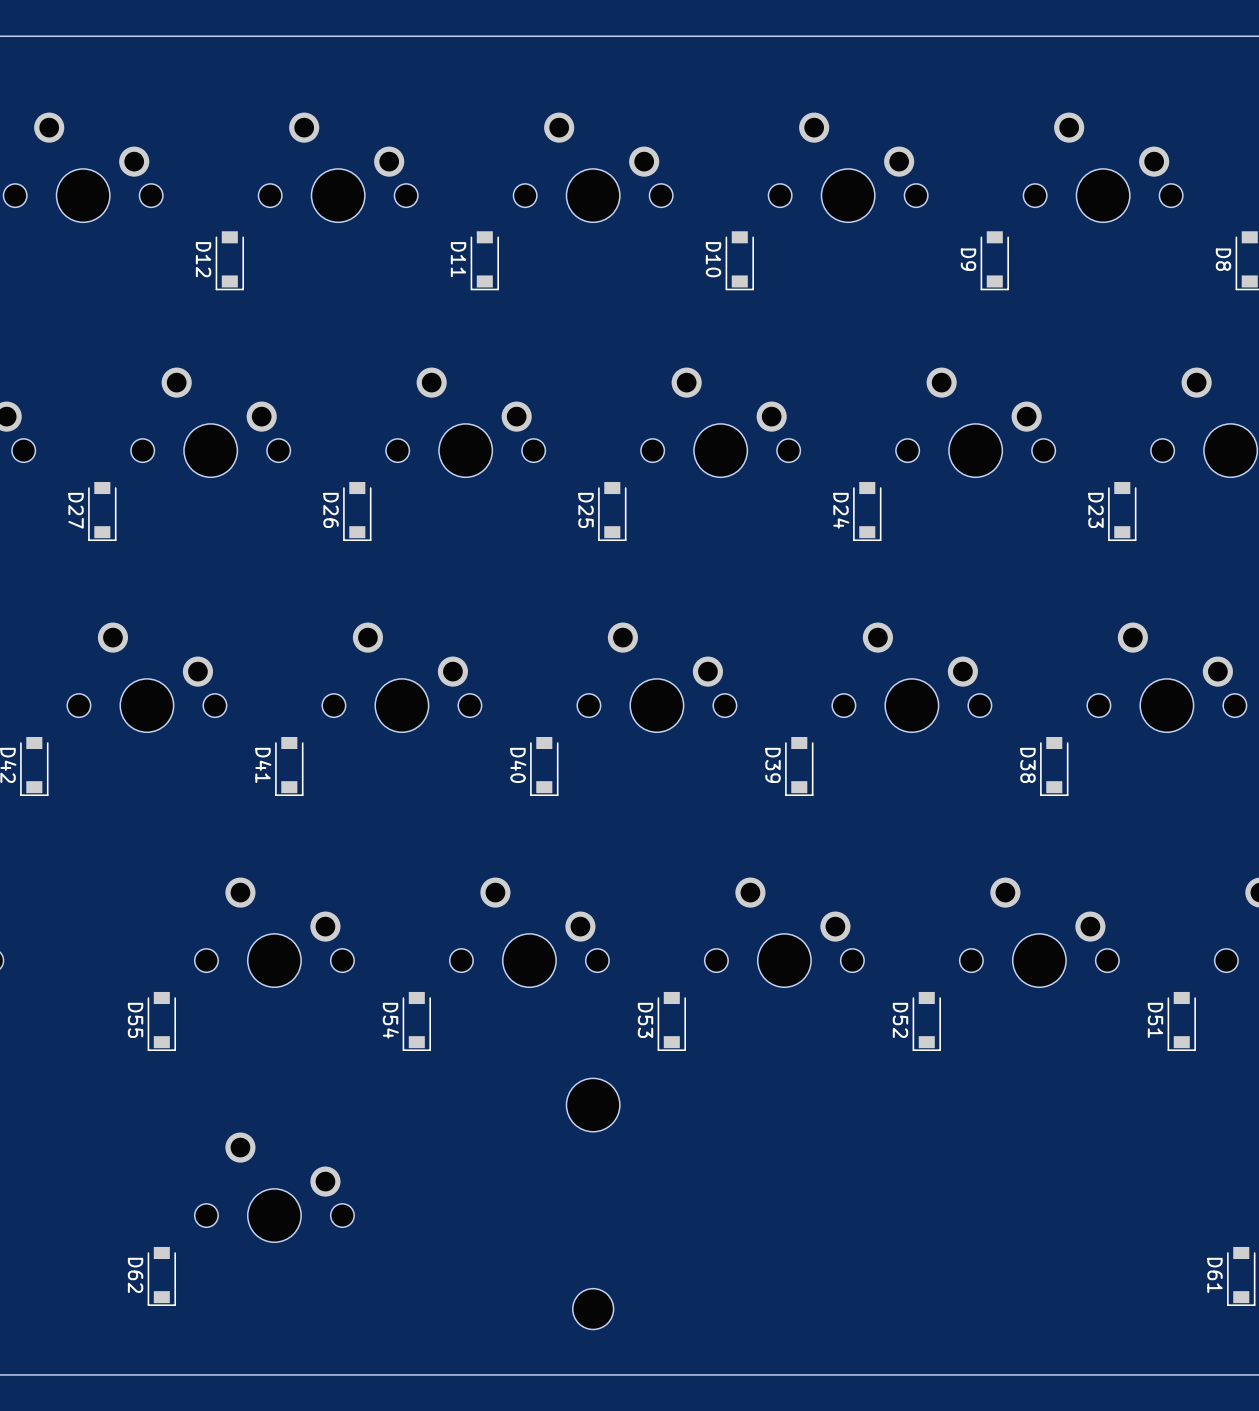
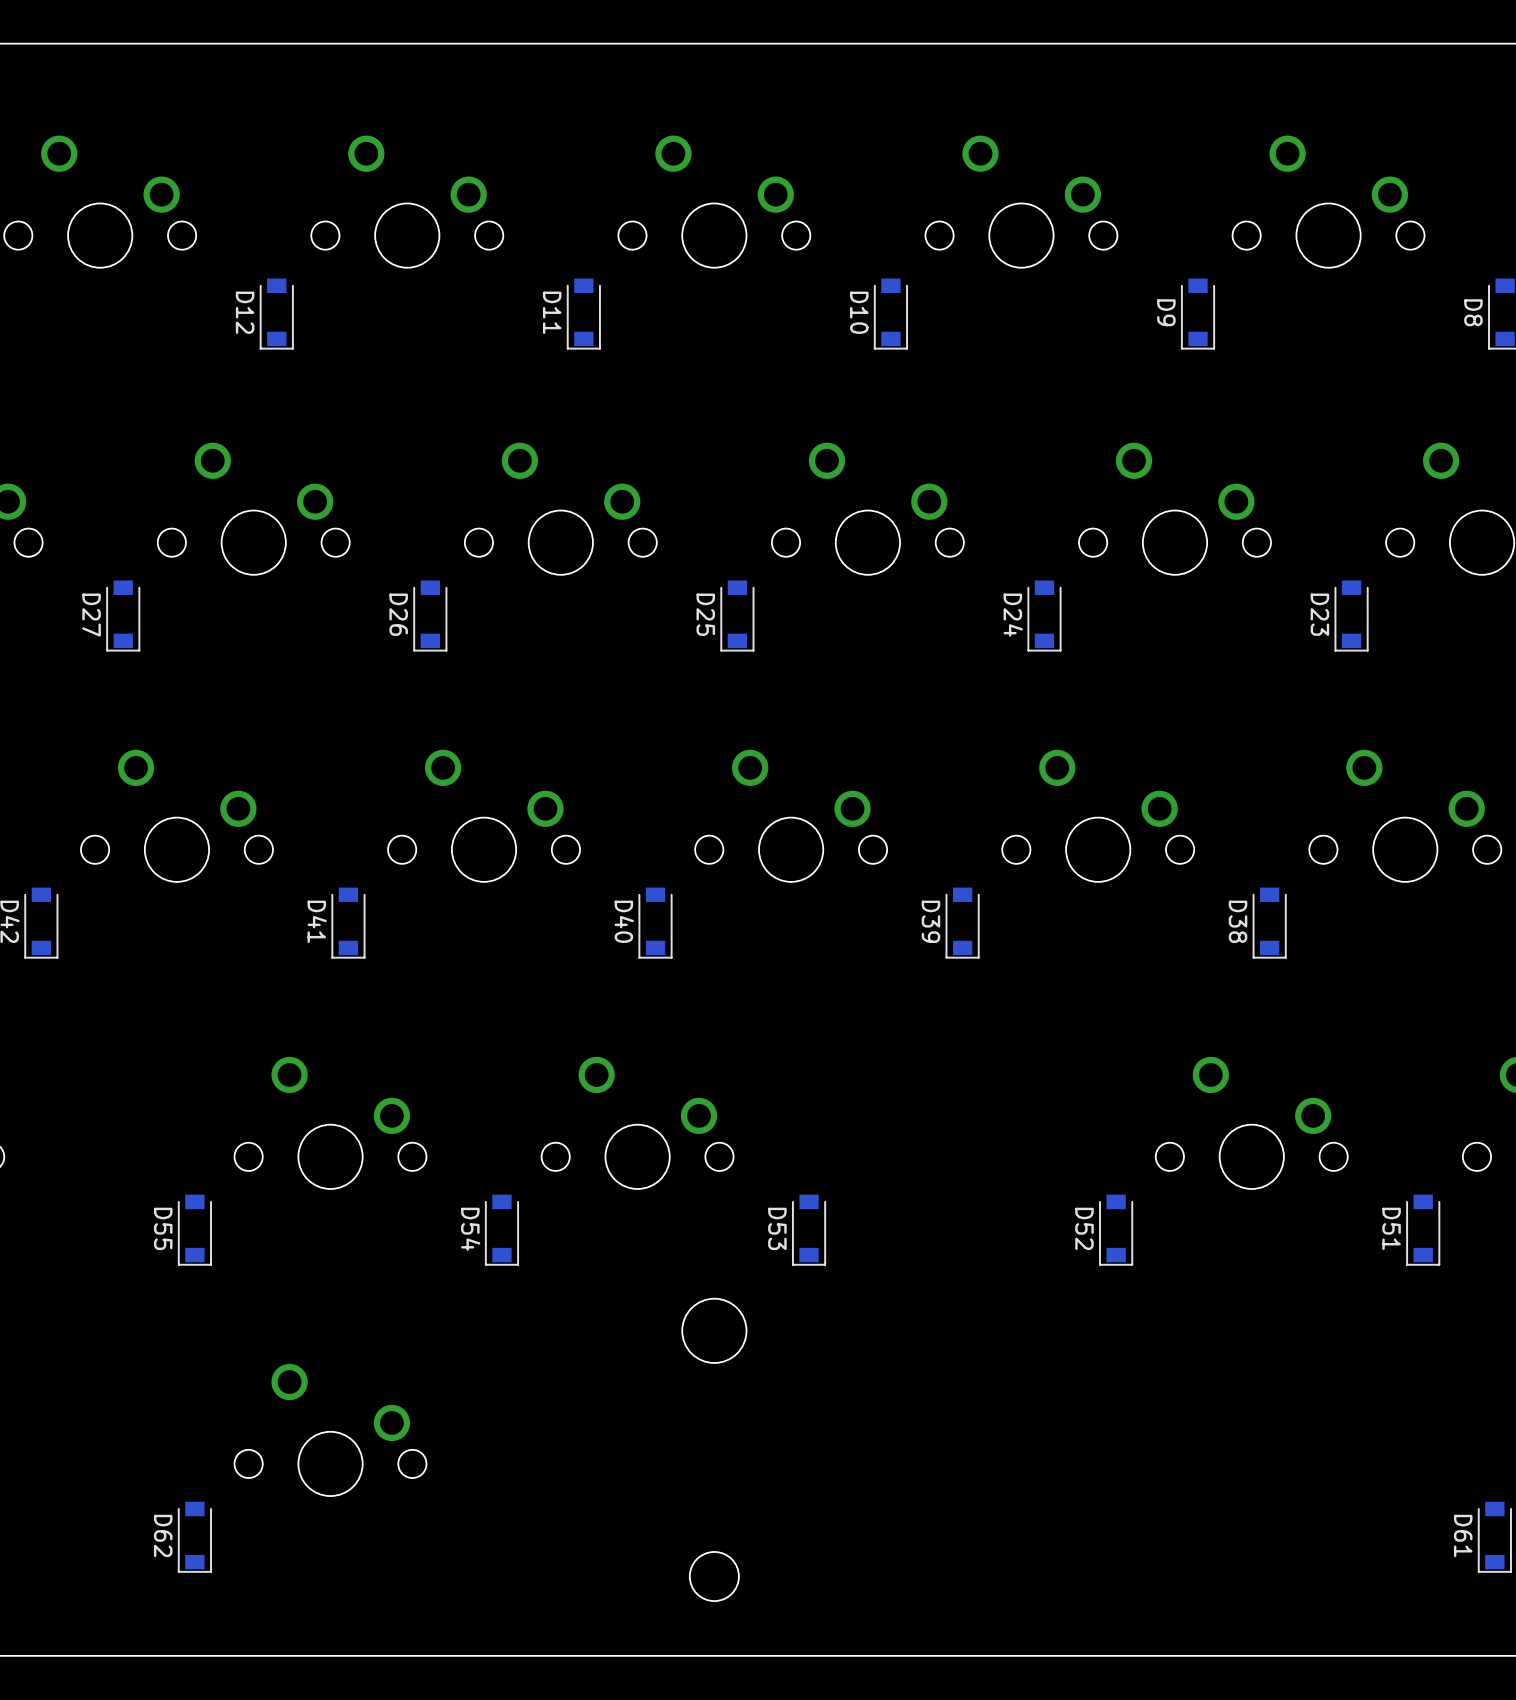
part: (784, 932) -> none

